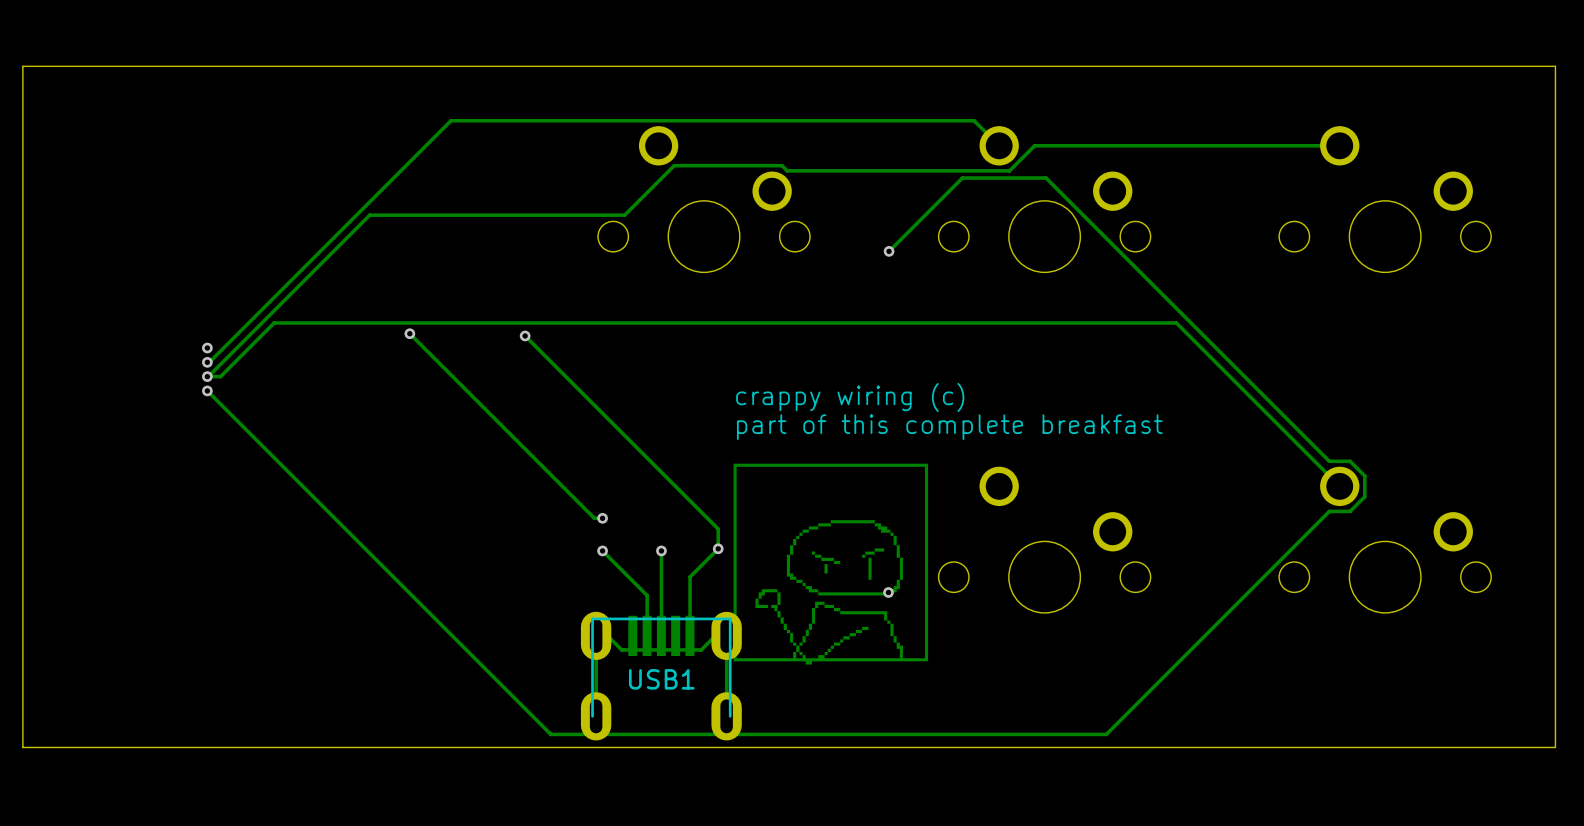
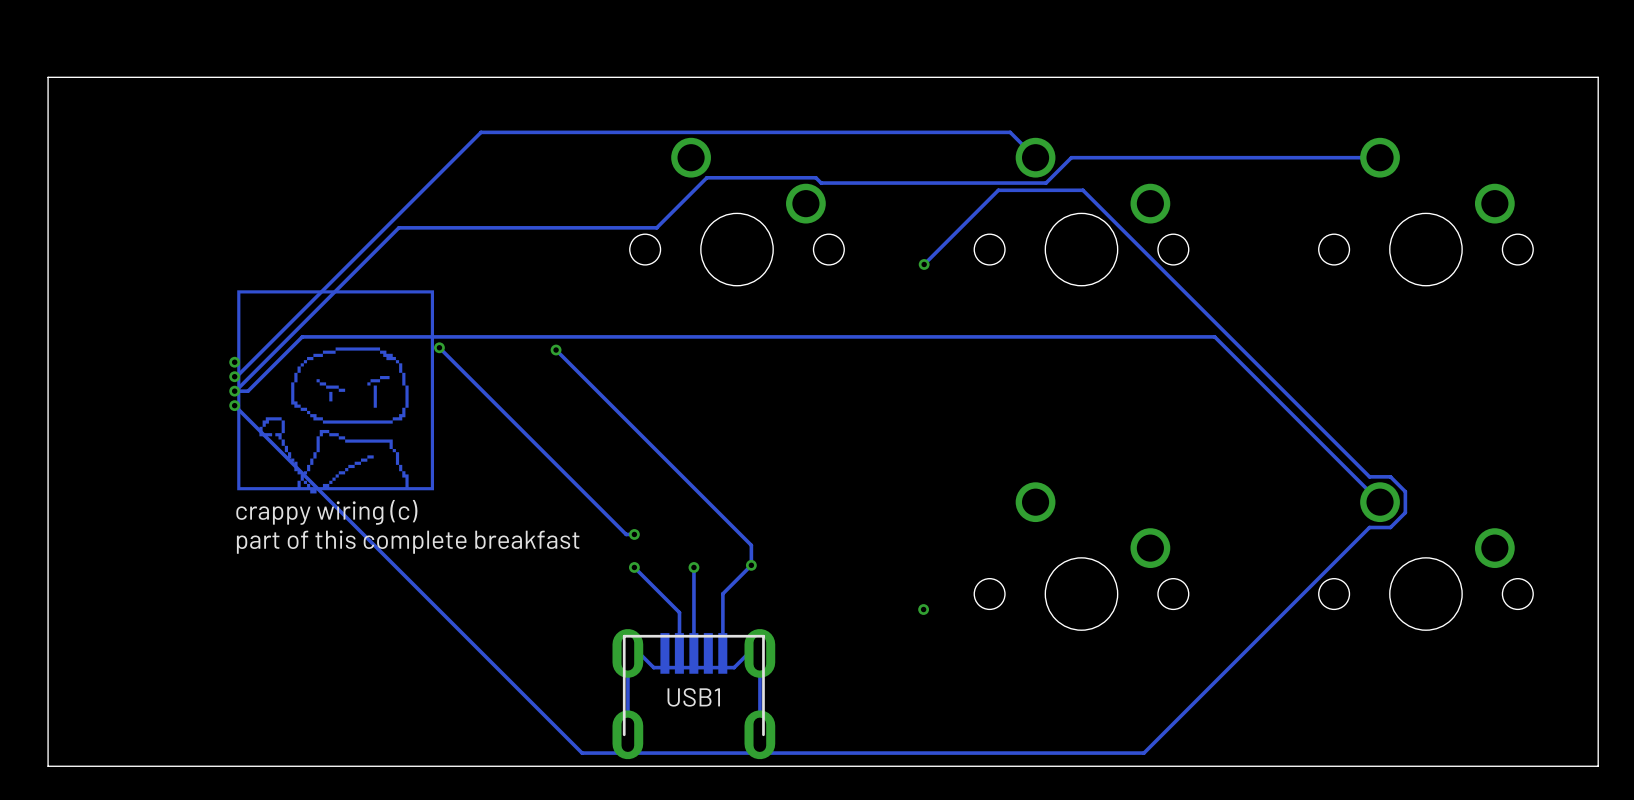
drawing: none -> [237, 290, 435, 494]
text: crappy wiring (c) (850, 397) -> none
text: part of this complete breakfast (949, 427) -> none
drawing: [733, 463, 929, 665] -> none
text: none -> crappy wiring (c) (326, 512)
text: none -> part of this complete breakfast (408, 542)

